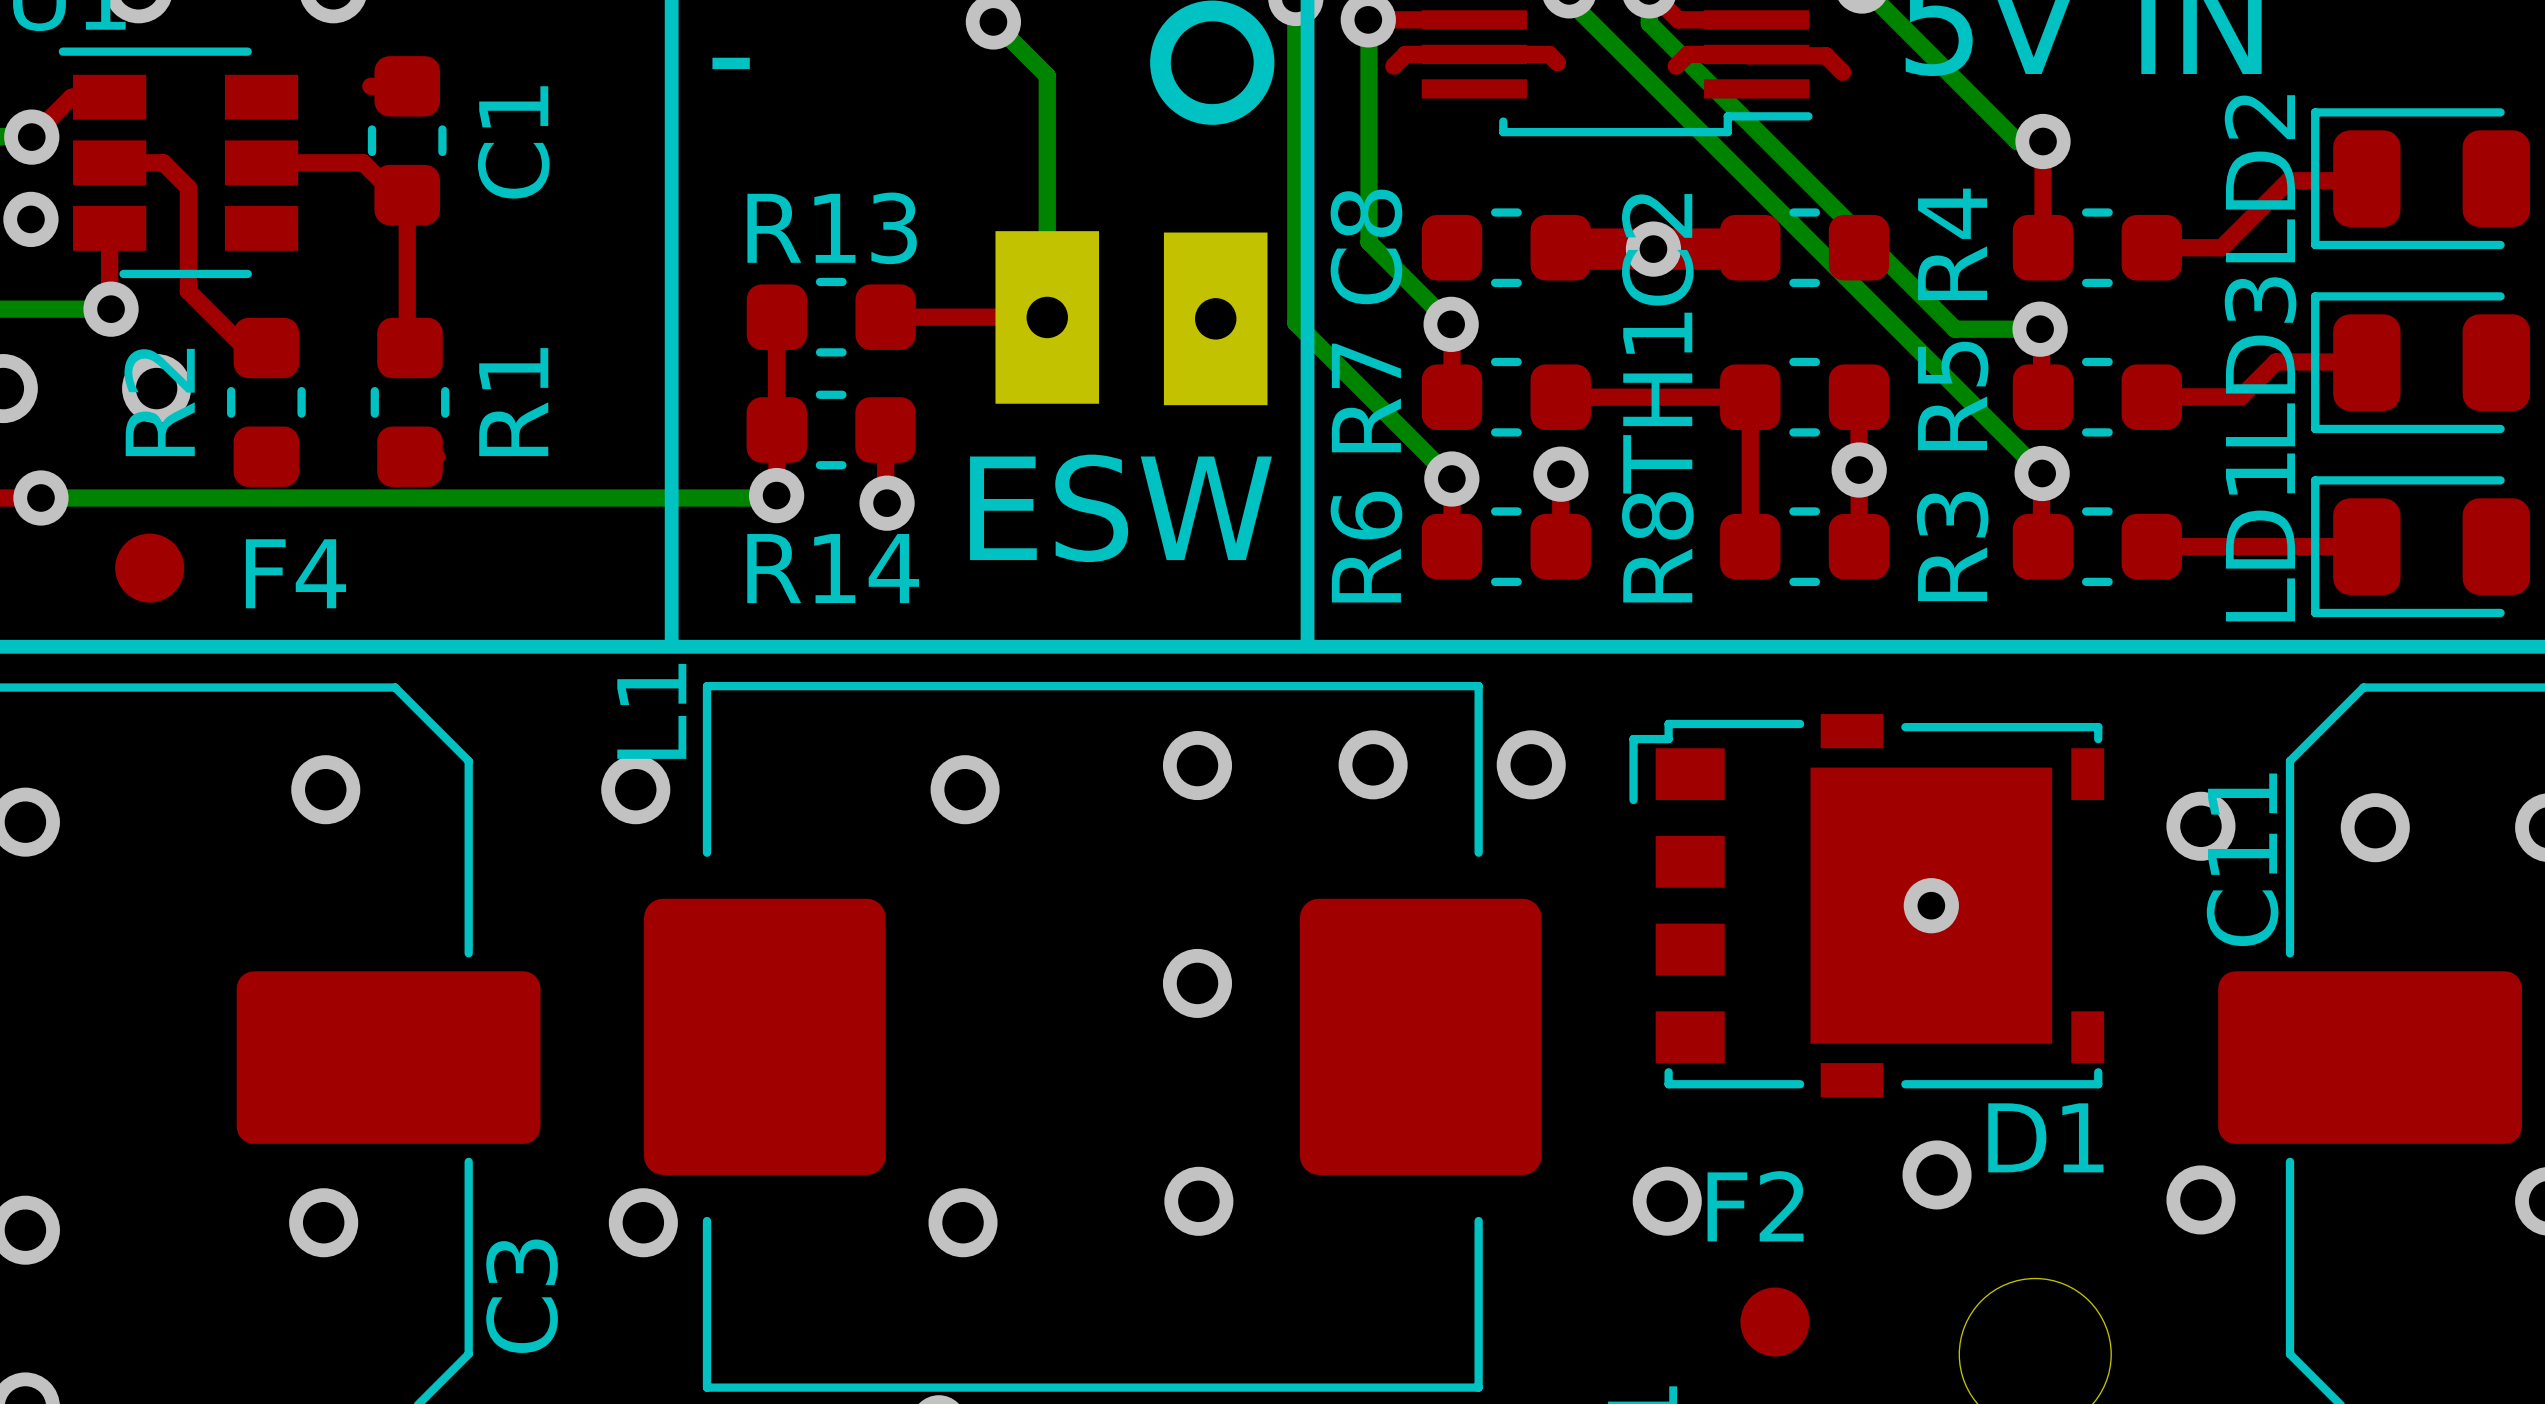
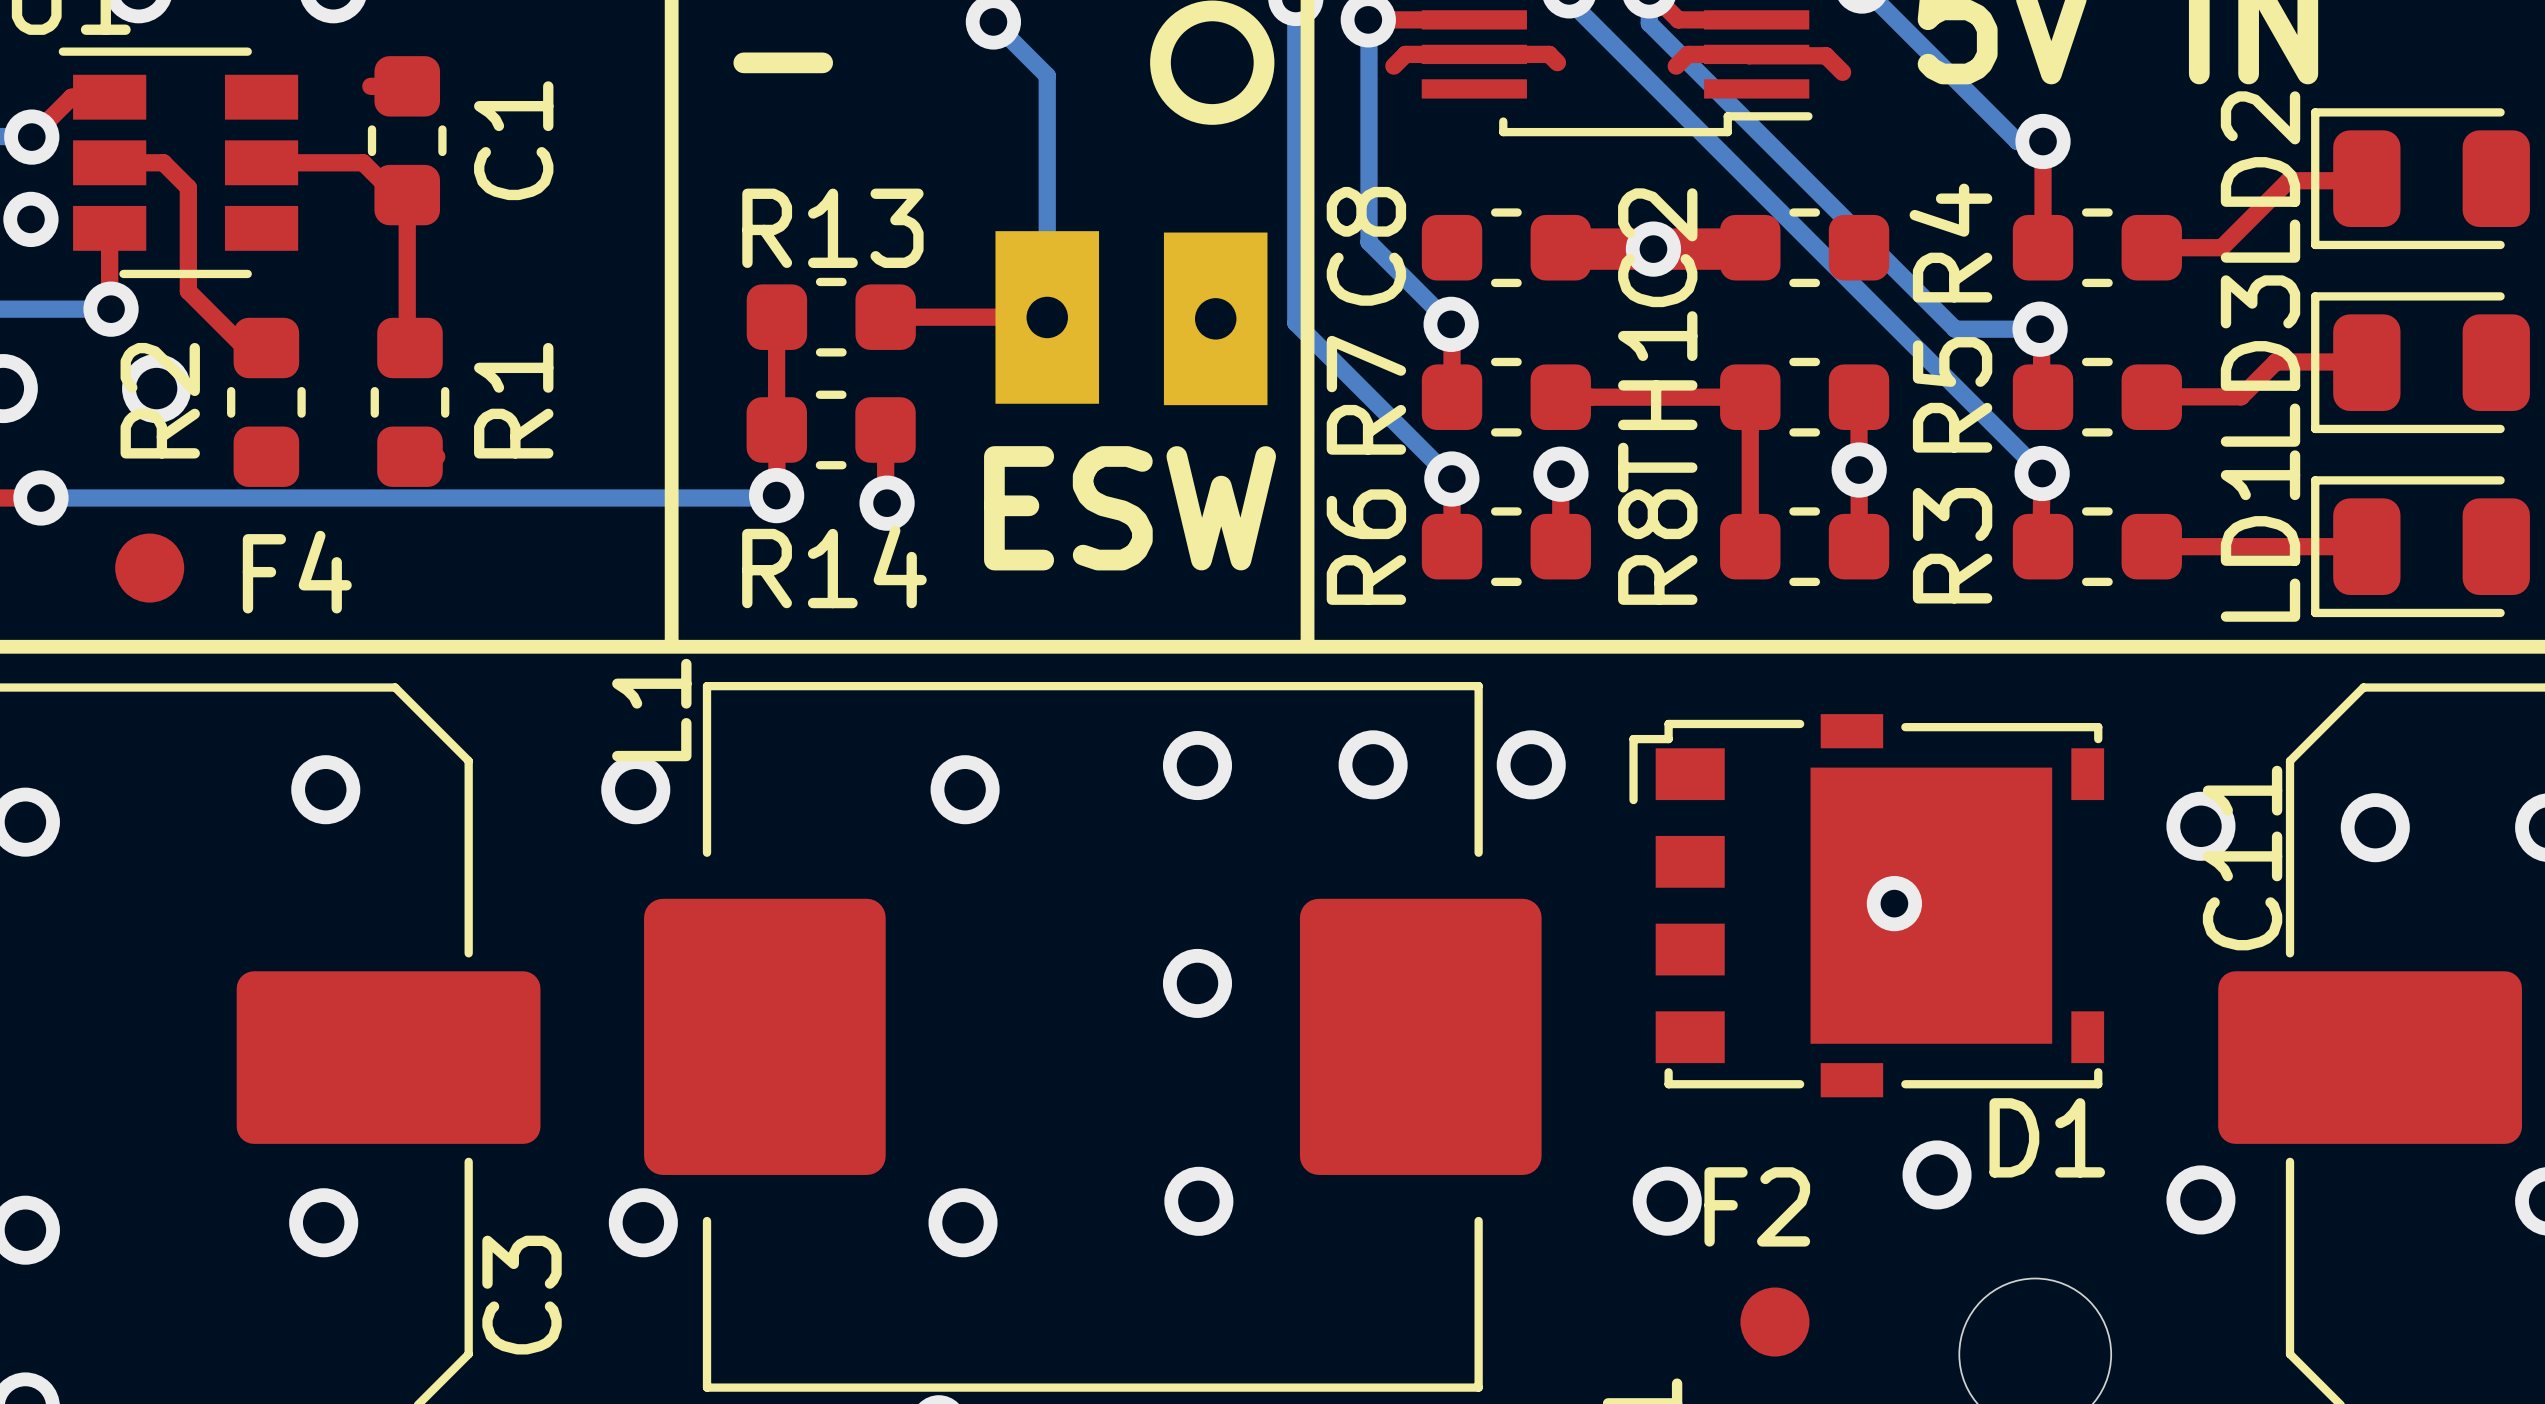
via position: (1931, 905) -> (1894, 903)

